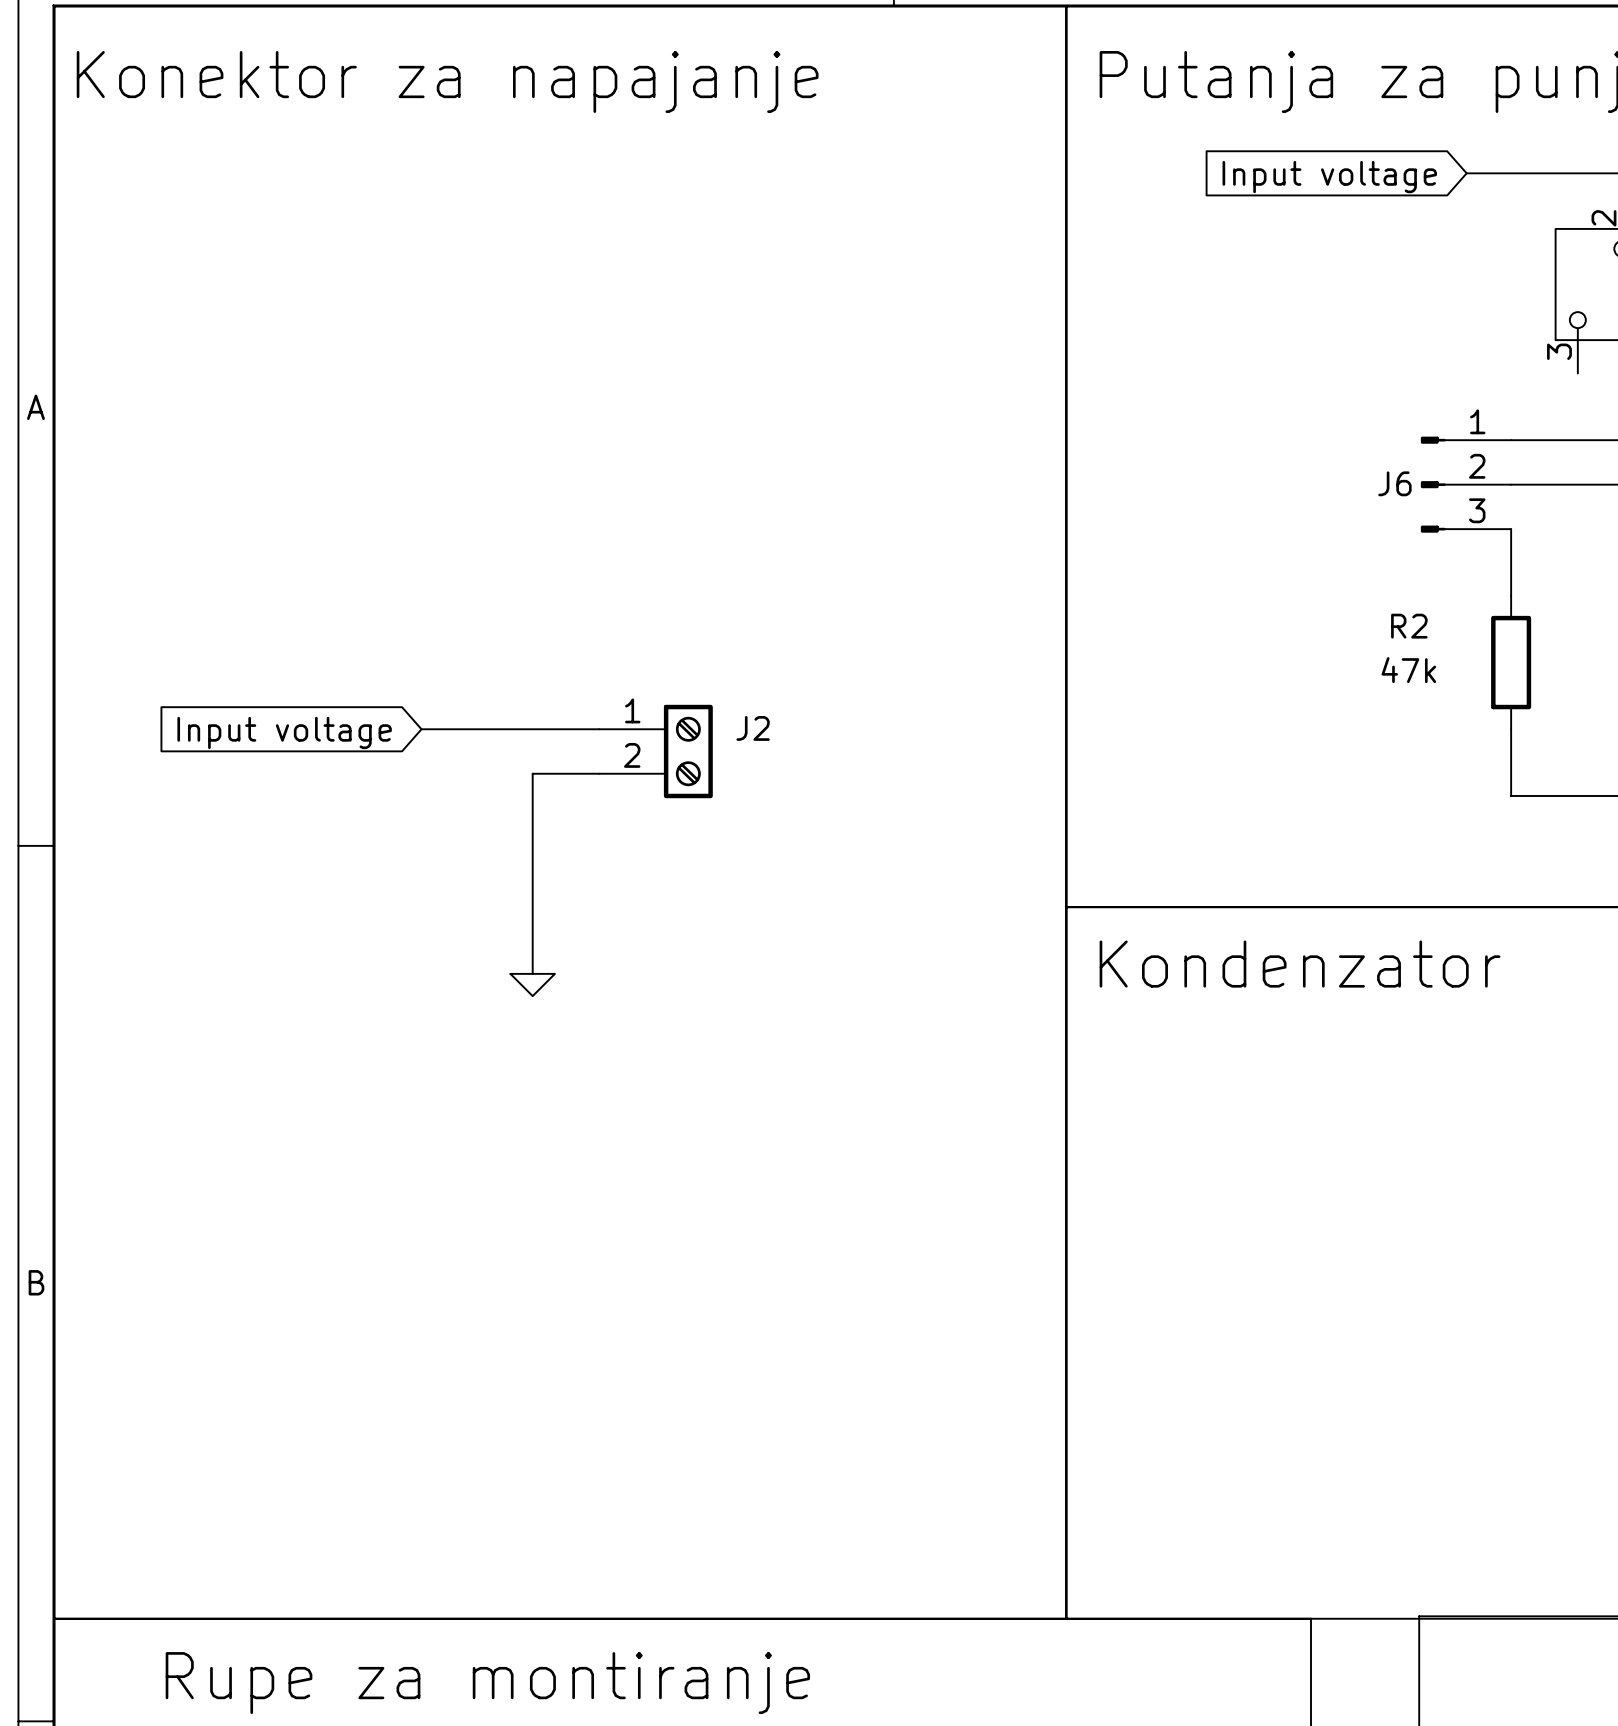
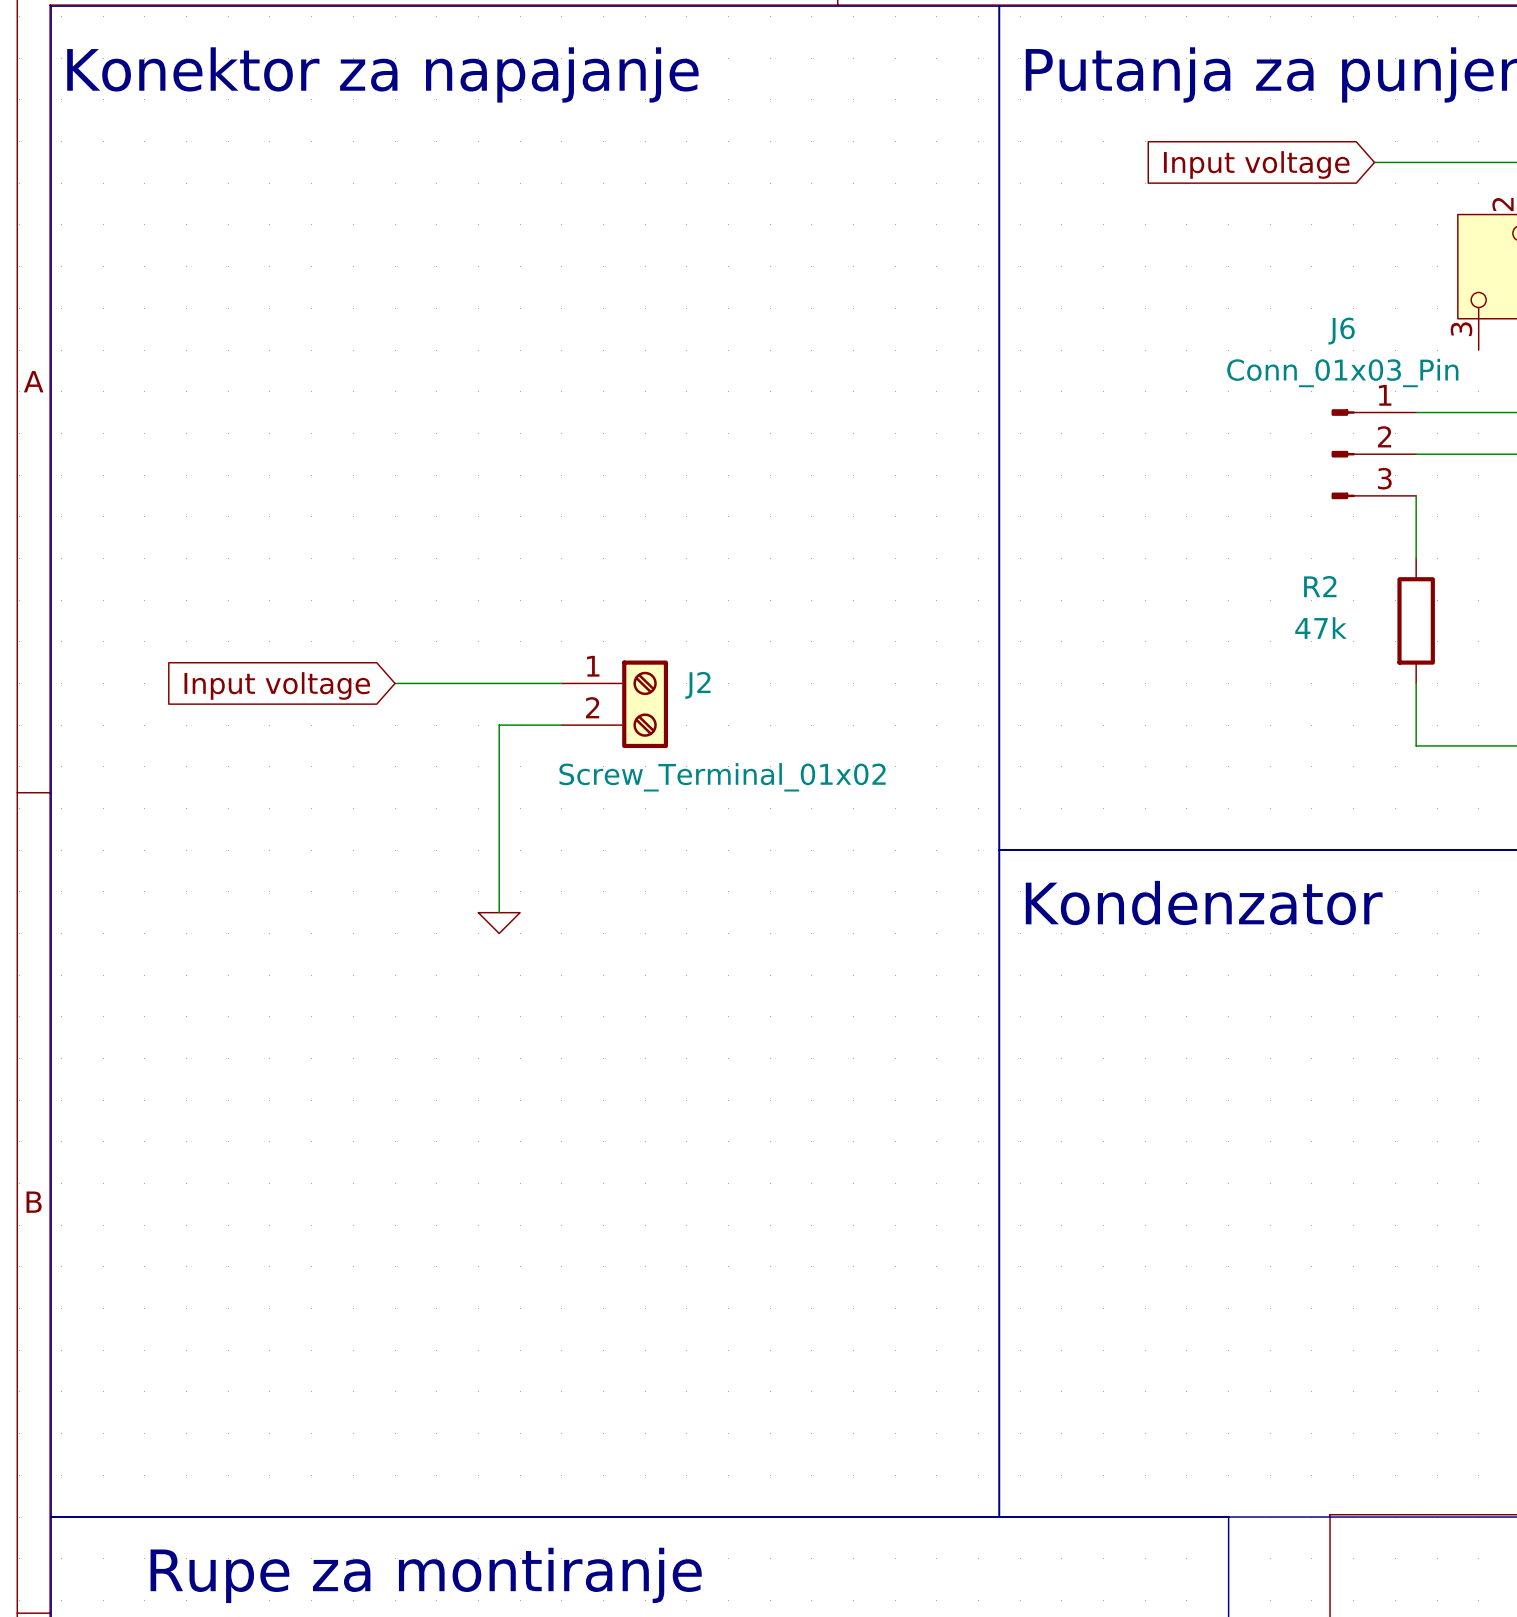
J6 value: none -> Conn_01x03_Pin (1342, 372)
J6 name position: J6 (1394, 483) -> J6 (1341, 331)
J2 value: none -> Screw_Terminal_01x02 (722, 777)

